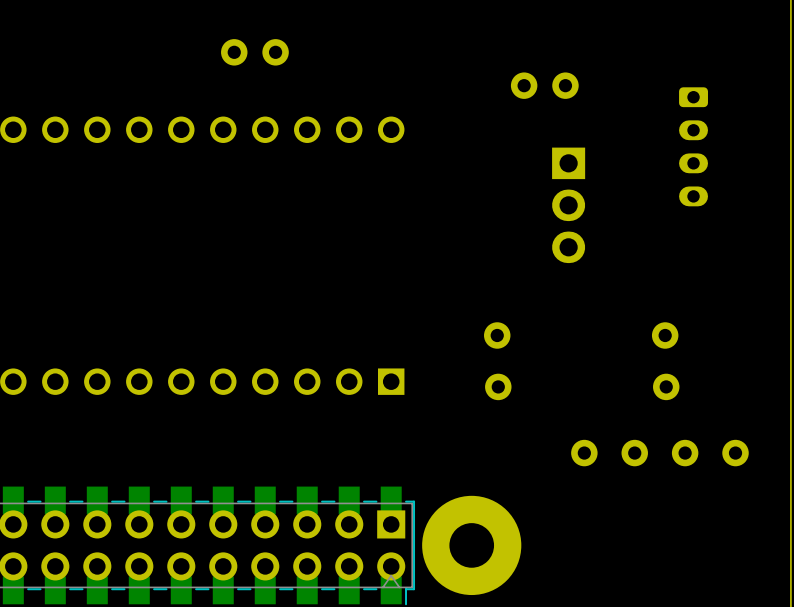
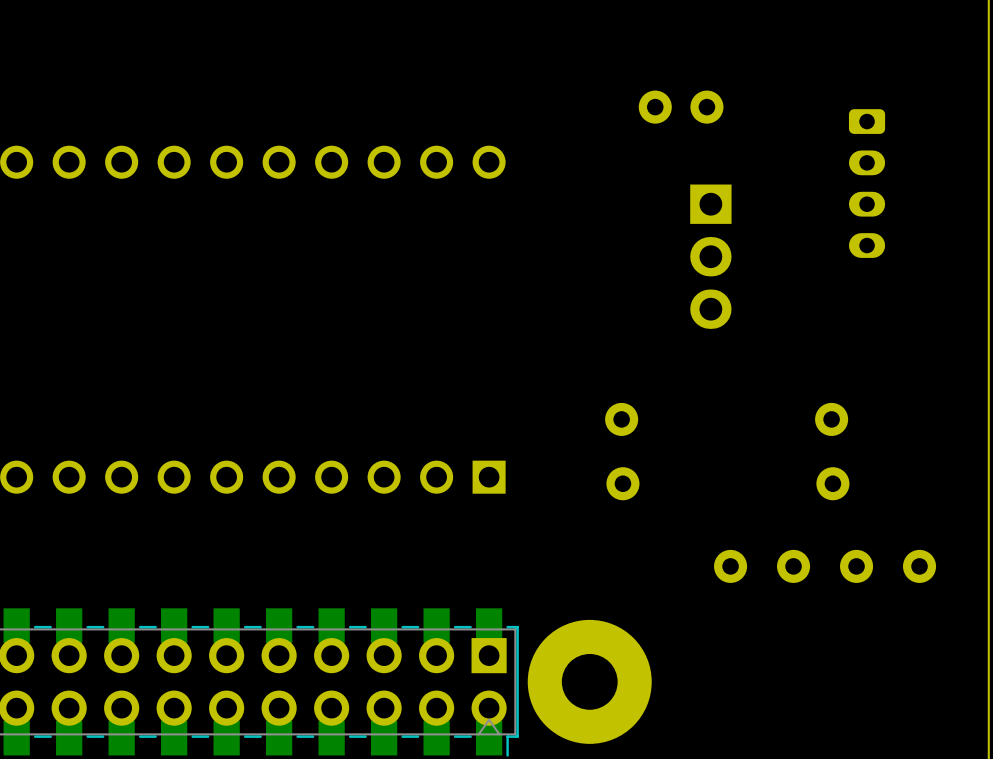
part: (254, 52) -> none

